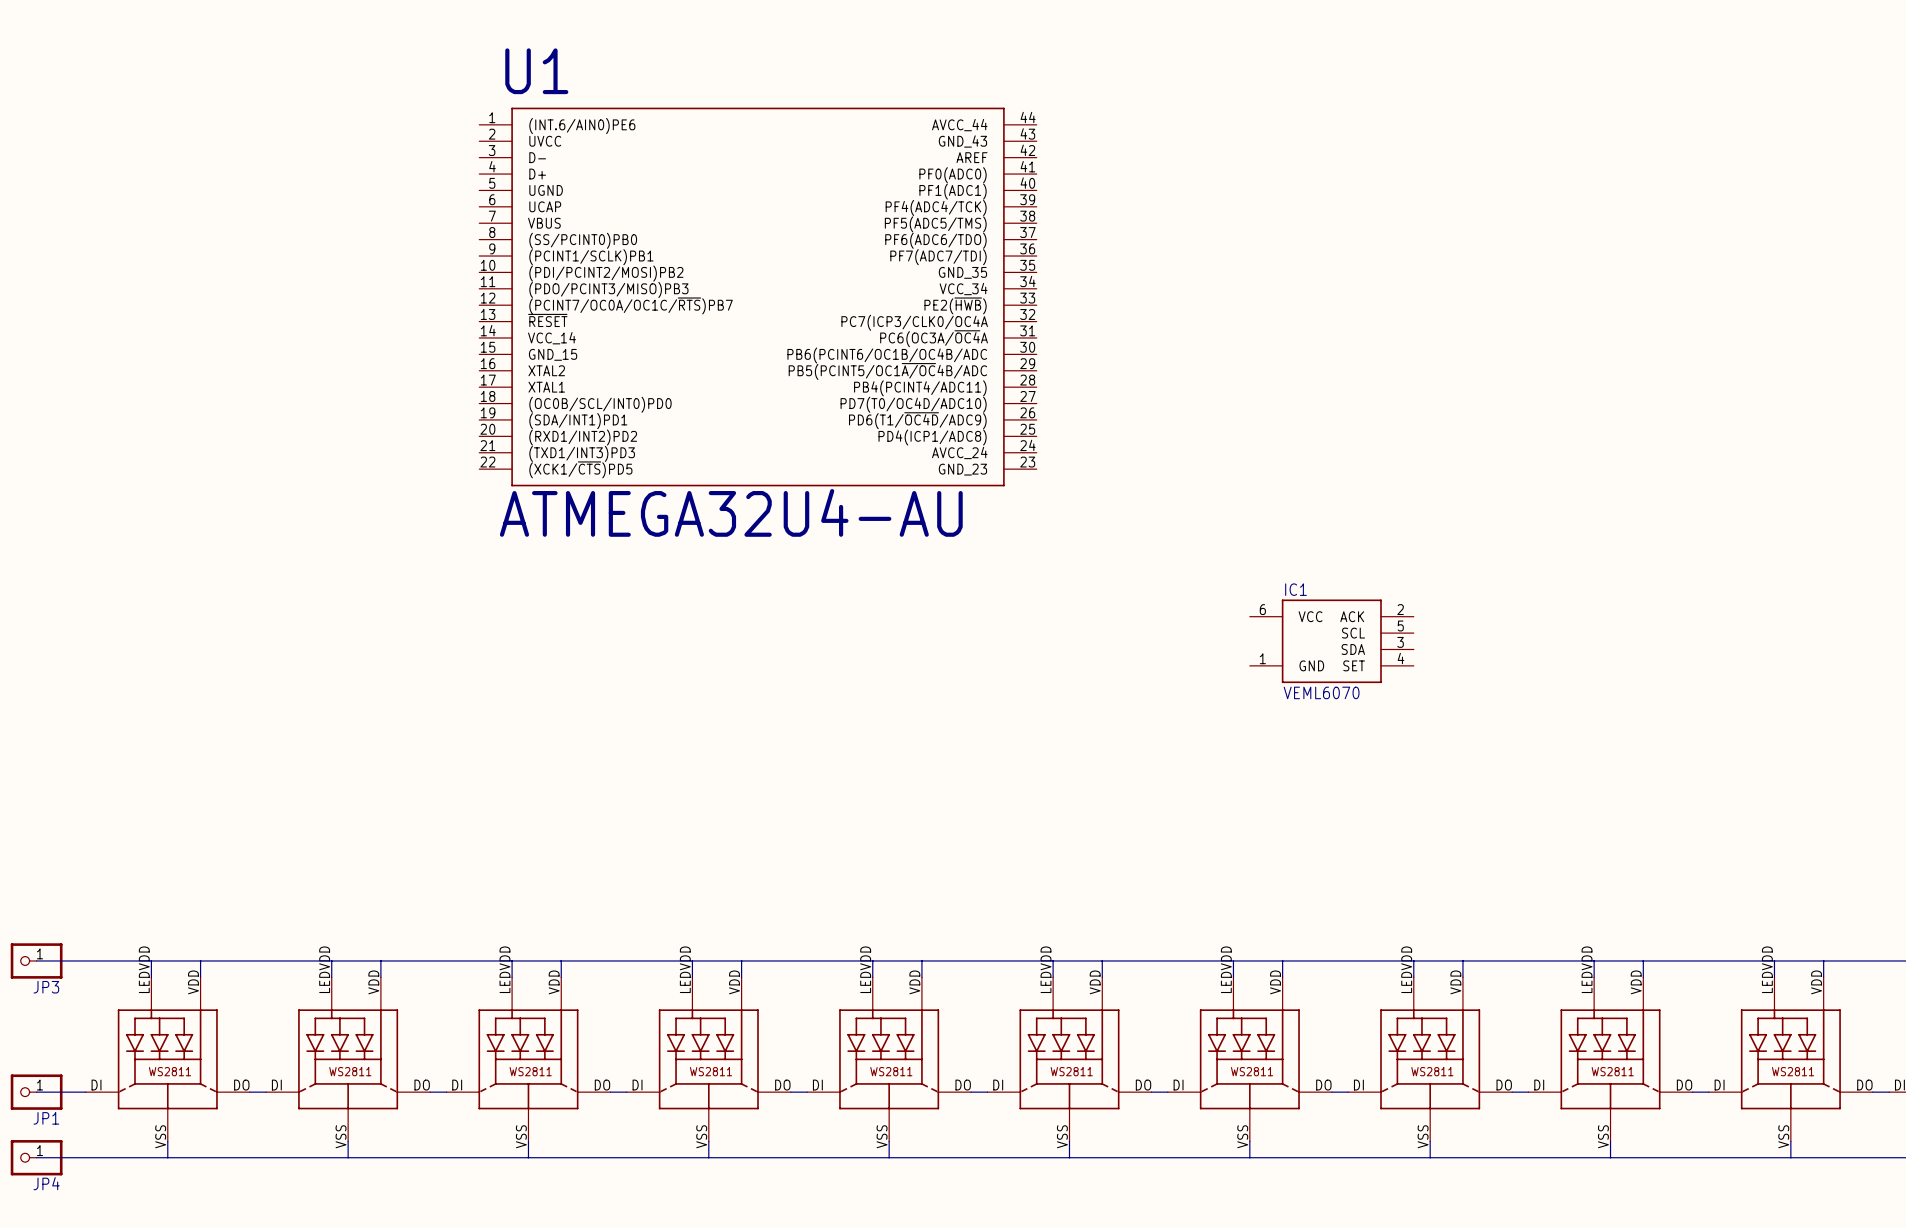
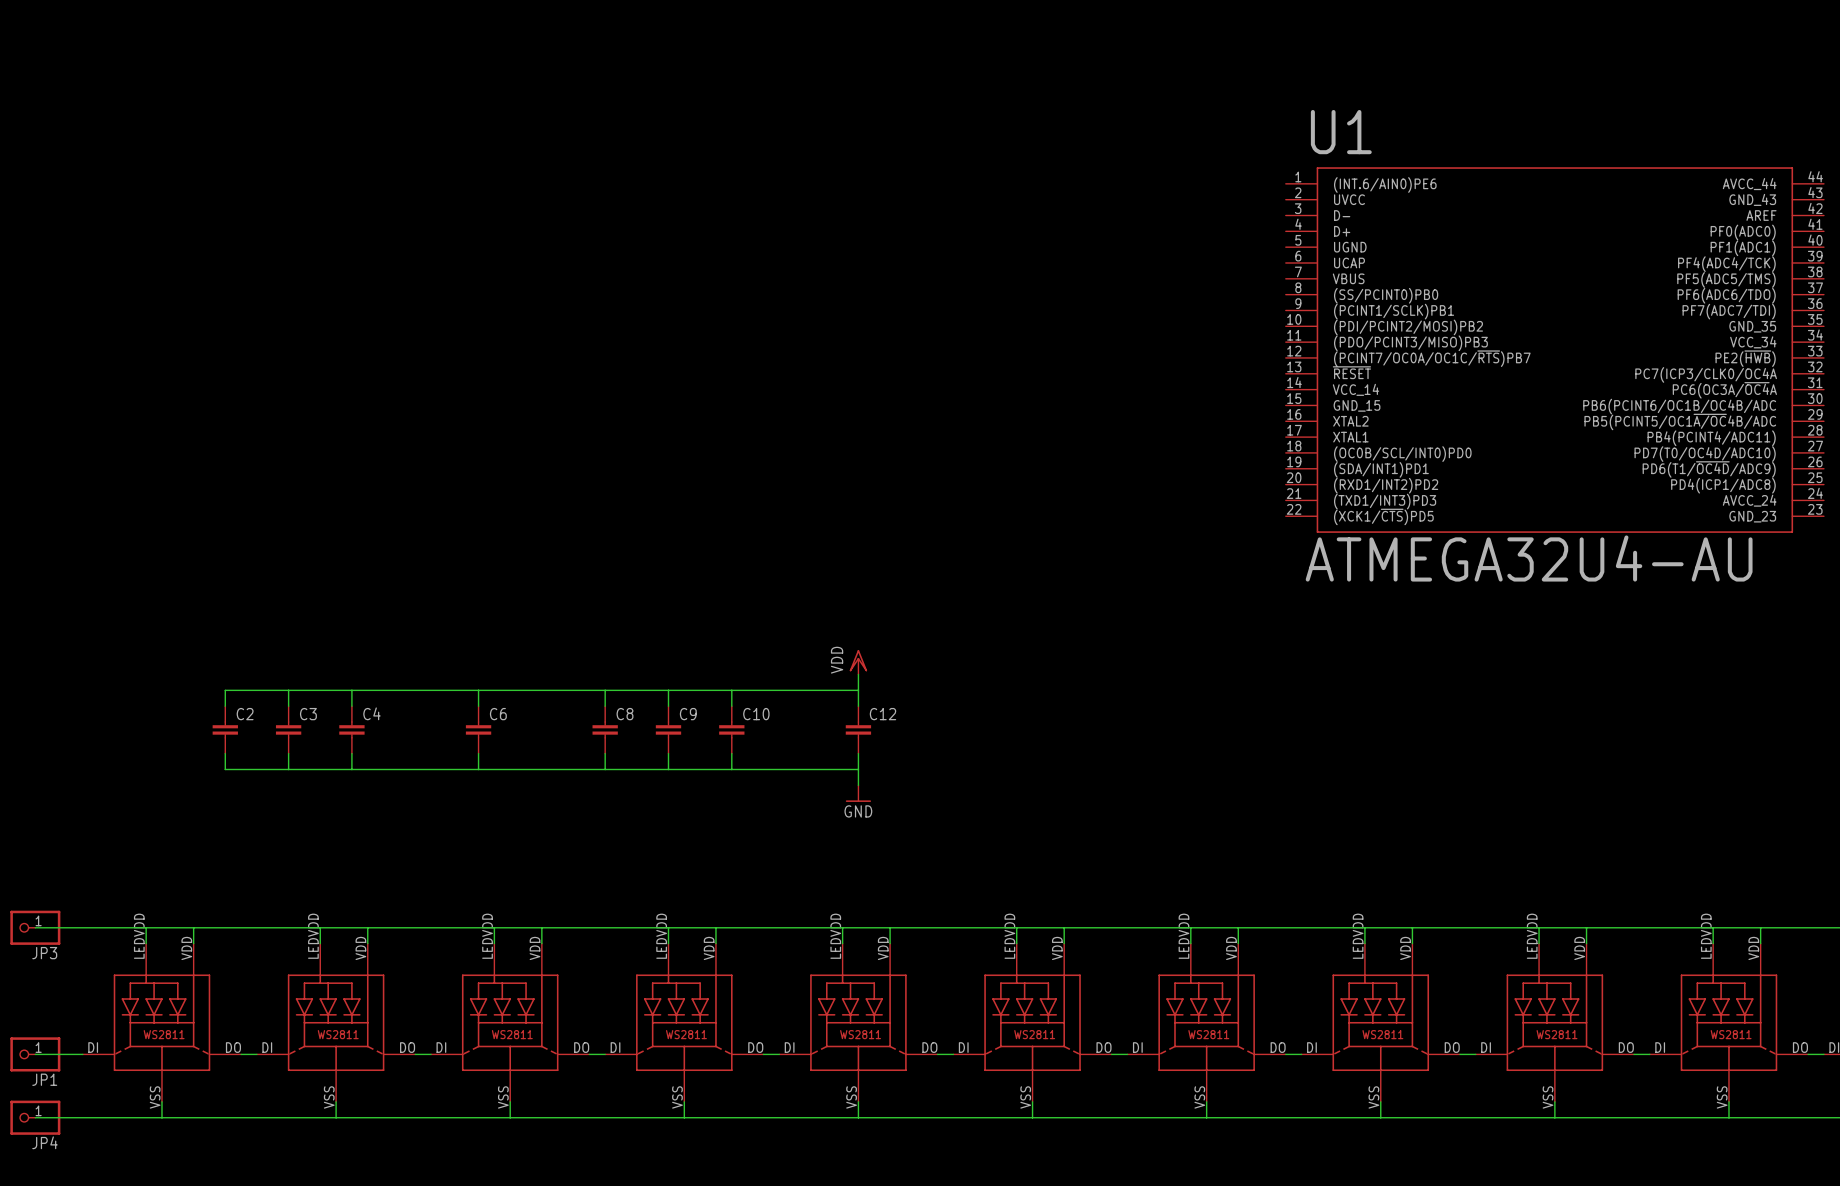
U1 position: (757, 297) -> (1554, 350)
IC1: VEML6070 (1331, 641) -> none
power symbol: none -> VDD (858, 662)
wire: none -> (858, 674) (858, 706)
wire: none -> (288, 690) (288, 706)
wire: none -> (351, 690) (351, 706)
wire: none -> (478, 690) (478, 706)
wire: none -> (605, 690) (605, 706)
wire: none -> (668, 690) (668, 706)
wire: none -> (731, 690) (731, 706)
wire: none -> (858, 690) (225, 690) (225, 706)
C2: none -> (225, 729)
C3: none -> (288, 729)
C4: none -> (351, 729)
C6: none -> (478, 729)
C8: none -> (605, 729)
C9: none -> (668, 729)
C10: none -> (731, 729)
C12: none -> (858, 729)
wire: none -> (225, 753) (225, 769) (858, 769)
wire: none -> (288, 753) (288, 769)
wire: none -> (351, 753) (351, 769)
wire: none -> (478, 753) (478, 769)
wire: none -> (605, 753) (605, 769)
wire: none -> (668, 753) (668, 769)
wire: none -> (731, 753) (731, 769)
wire: none -> (858, 753) (858, 785)
power symbol: none -> GND (858, 793)

